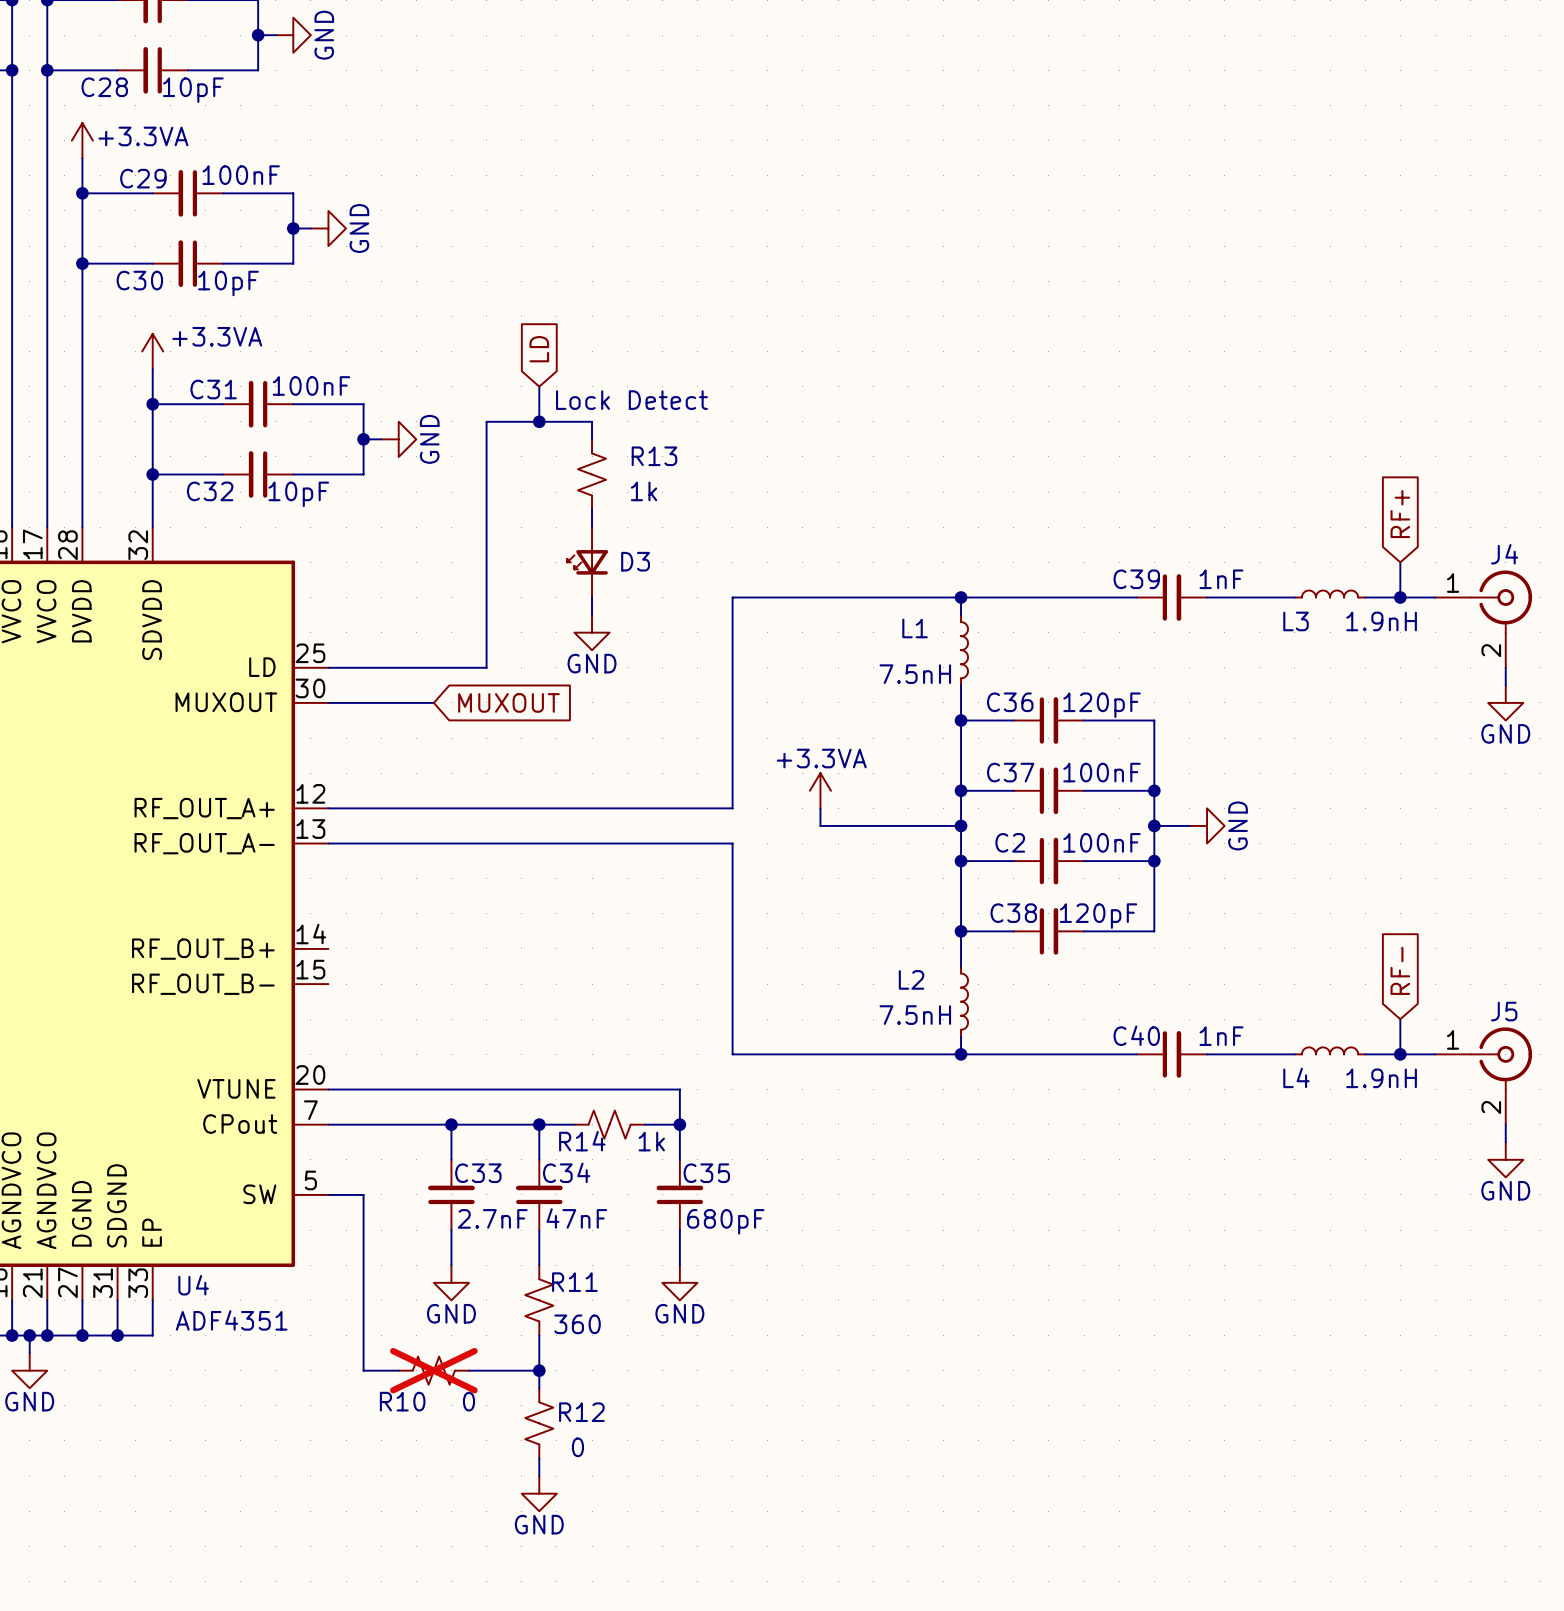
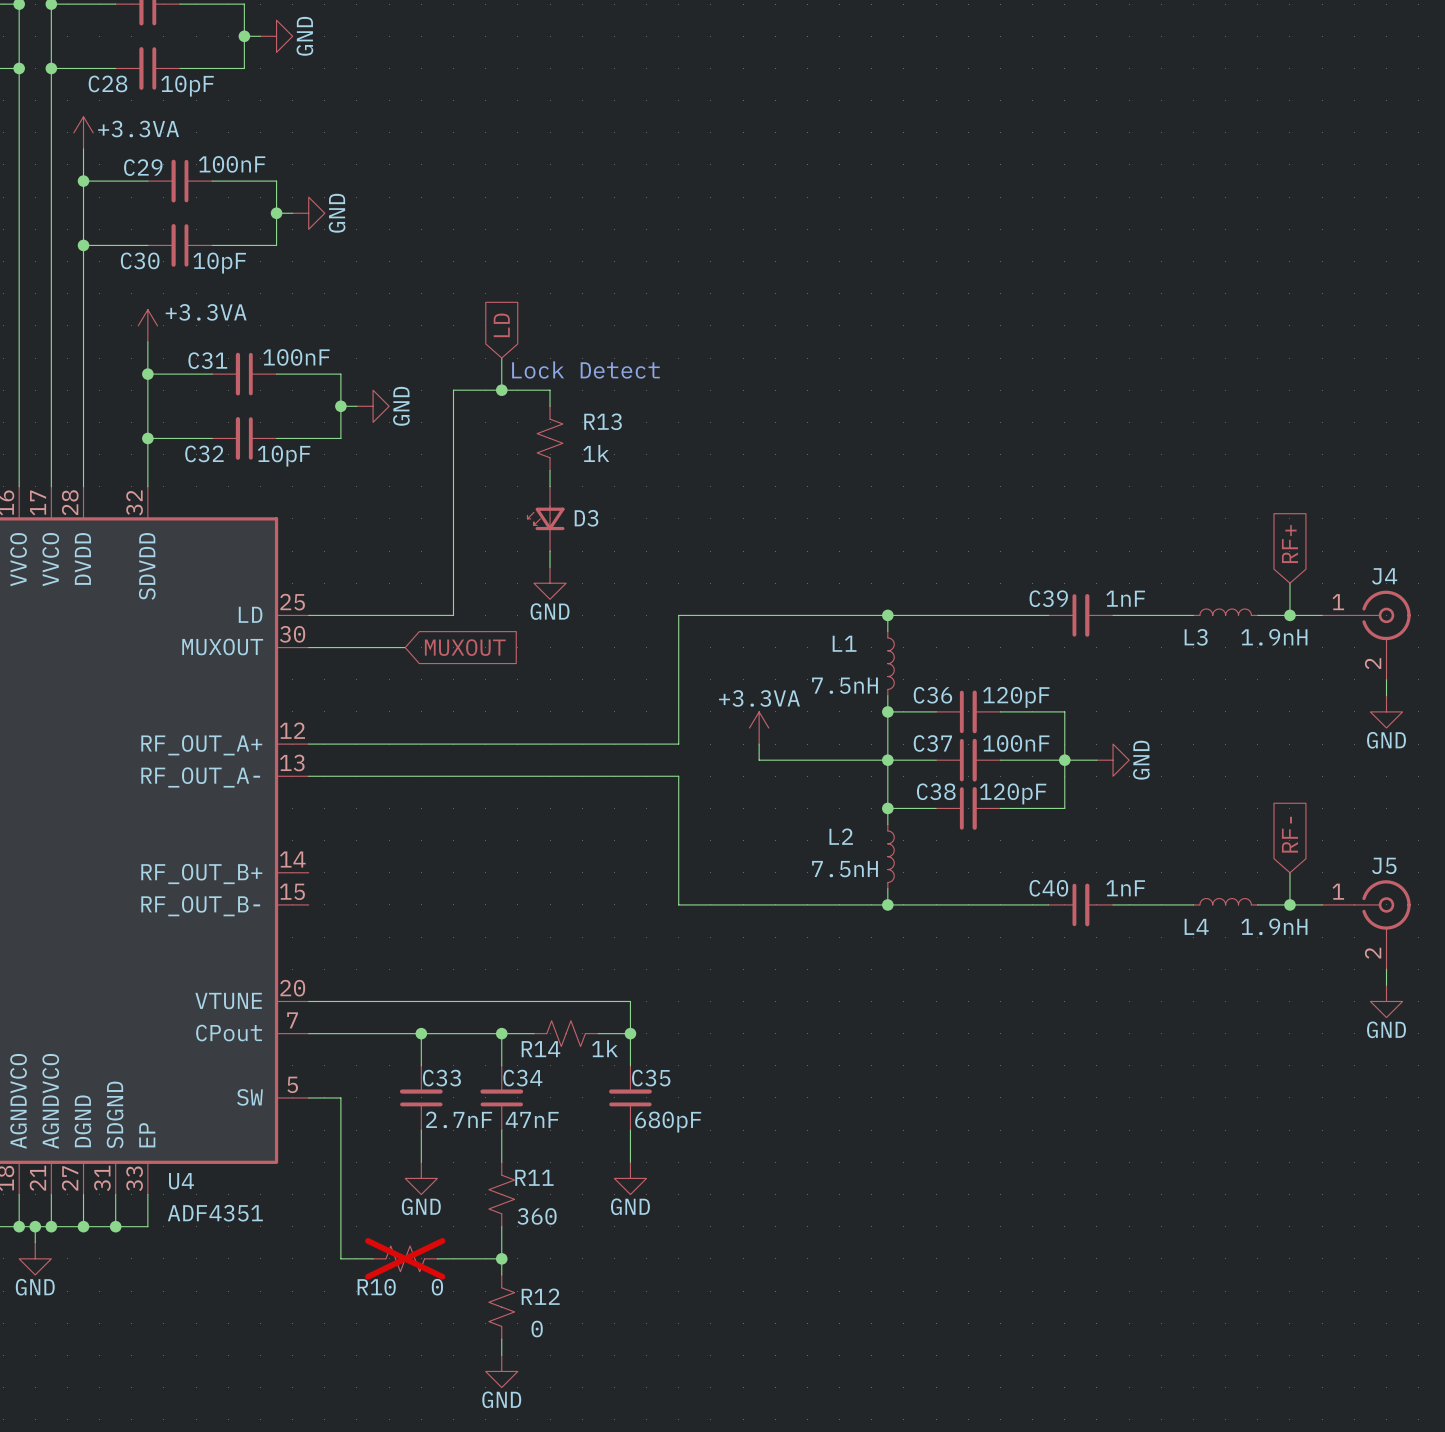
global label position: RF+ (1400, 514) -> RF+ (1289, 544)
wire: (1400, 562) (1400, 597) -> (1289, 583) (1289, 615)
L3 position: (1330, 594) -> (1225, 612)
wire: (961, 597) (961, 615) -> none
junction: (961, 597) -> none
wire: (1136, 597) (732, 597) (732, 667) -> (1048, 615) (678, 615)
C39 position: (1171, 597) -> (1080, 615)
wire: (1207, 597) (1294, 597) -> (1113, 615) (1193, 615)
wire: (1365, 597) (1435, 597) -> (1257, 615) (1322, 615)
junction position: (1400, 597) -> (1289, 615)
J4 position: (1483, 619) -> (1366, 635)
L1 position: (964, 650) -> (891, 663)
junction: none -> (887, 615)
wire: (1505, 667) (1505, 685) -> (1386, 679) (1386, 695)
wire: (961, 685) (961, 755) -> (887, 631) (887, 615)
power symbol position: GND (1505, 702) -> GND (1386, 711)
wire: (961, 720) (1013, 720) -> none
junction: (961, 720) -> none
C36 position: (1048, 720) -> (968, 711)
wire: (1084, 720) (1154, 720) (1154, 773) -> (1000, 711) (1064, 711)
wire: (961, 790) (1013, 790) -> (887, 711) (936, 711)
junction position: (961, 790) -> (887, 711)
C37 position: (1048, 790) -> (968, 760)
wire: (1084, 790) (1154, 790) -> none
junction: (1154, 790) -> none
wire: (961, 861) (1013, 861) -> (887, 808) (936, 808)
junction position: (961, 861) -> (887, 808)
C2: 100nF (1048, 861) -> none
wire: (1084, 861) (1154, 861) -> (1000, 760) (1064, 760)
junction: (1154, 861) -> none
wire: (1154, 878) (1154, 931) (1084, 931) -> (1064, 808) (1000, 808)
wire: (961, 896) (961, 966) -> (887, 904) (887, 888)
wire: (961, 931) (1013, 931) -> (887, 760) (936, 760)
junction: (961, 931) -> none
C38 position: (1048, 931) -> (968, 808)
global label position: RF- (1400, 970) -> RF- (1289, 834)
wire: (732, 984) (732, 1054) (1136, 1054) -> (678, 904) (1048, 904)
junction: none -> (887, 904)
L2 position: (964, 1001) -> (891, 856)
wire: (1400, 1019) (1400, 1054) -> (1289, 872) (1289, 904)
wire: (961, 1036) (961, 1054) -> none
L4 position: (1330, 1050) -> (1225, 901)
junction: (961, 1054) -> none
C40 position: (1171, 1054) -> (1080, 904)
wire: (1207, 1054) (1294, 1054) -> (1113, 904) (1193, 904)
wire: (1365, 1054) (1435, 1054) -> (1257, 904) (1322, 904)
junction position: (1400, 1054) -> (1289, 904)
J5 position: (1483, 1076) -> (1366, 924)
wire: (1505, 1124) (1505, 1142) -> (1386, 969) (1386, 985)
power symbol position: GND (1505, 1159) -> GND (1386, 1001)

